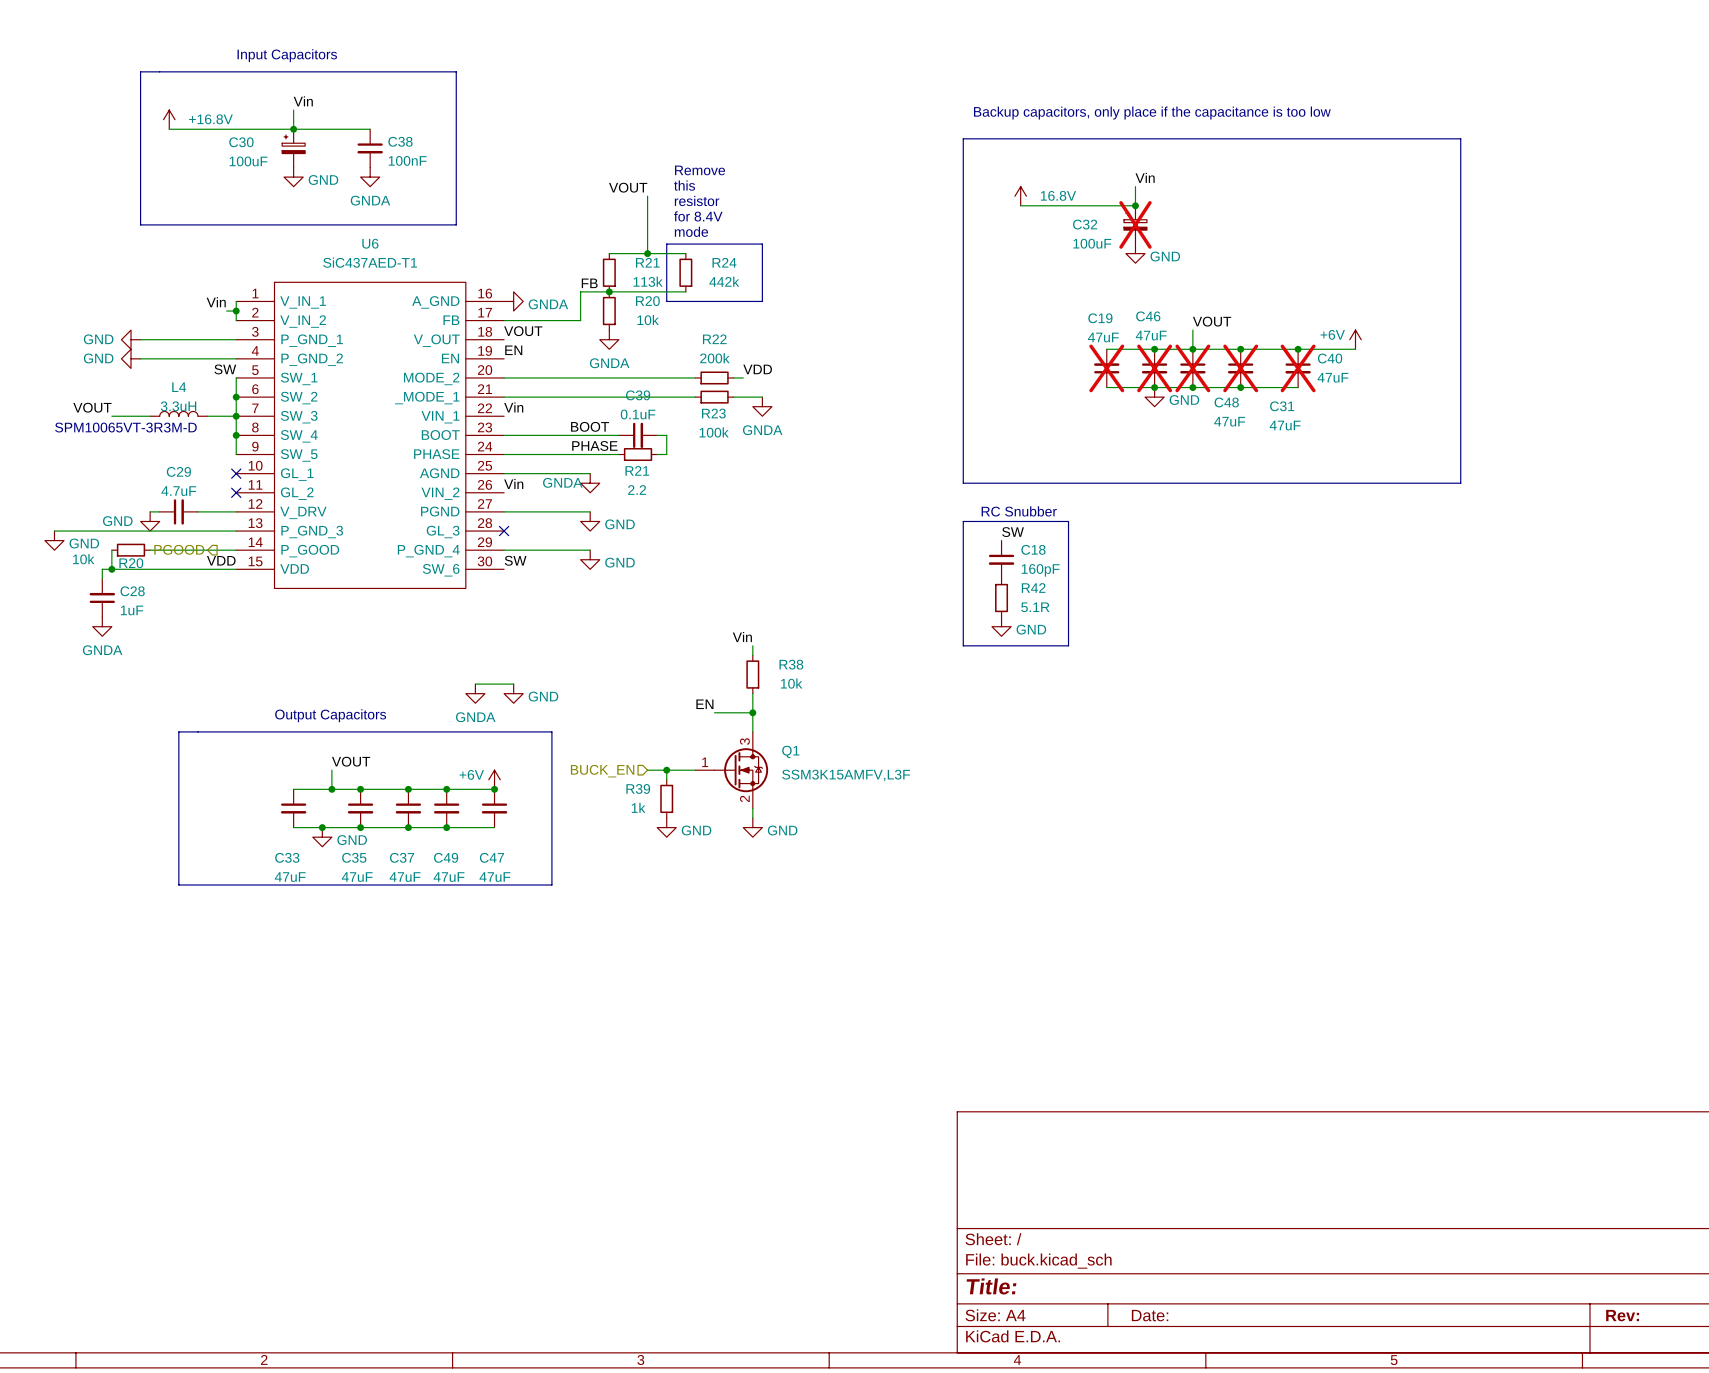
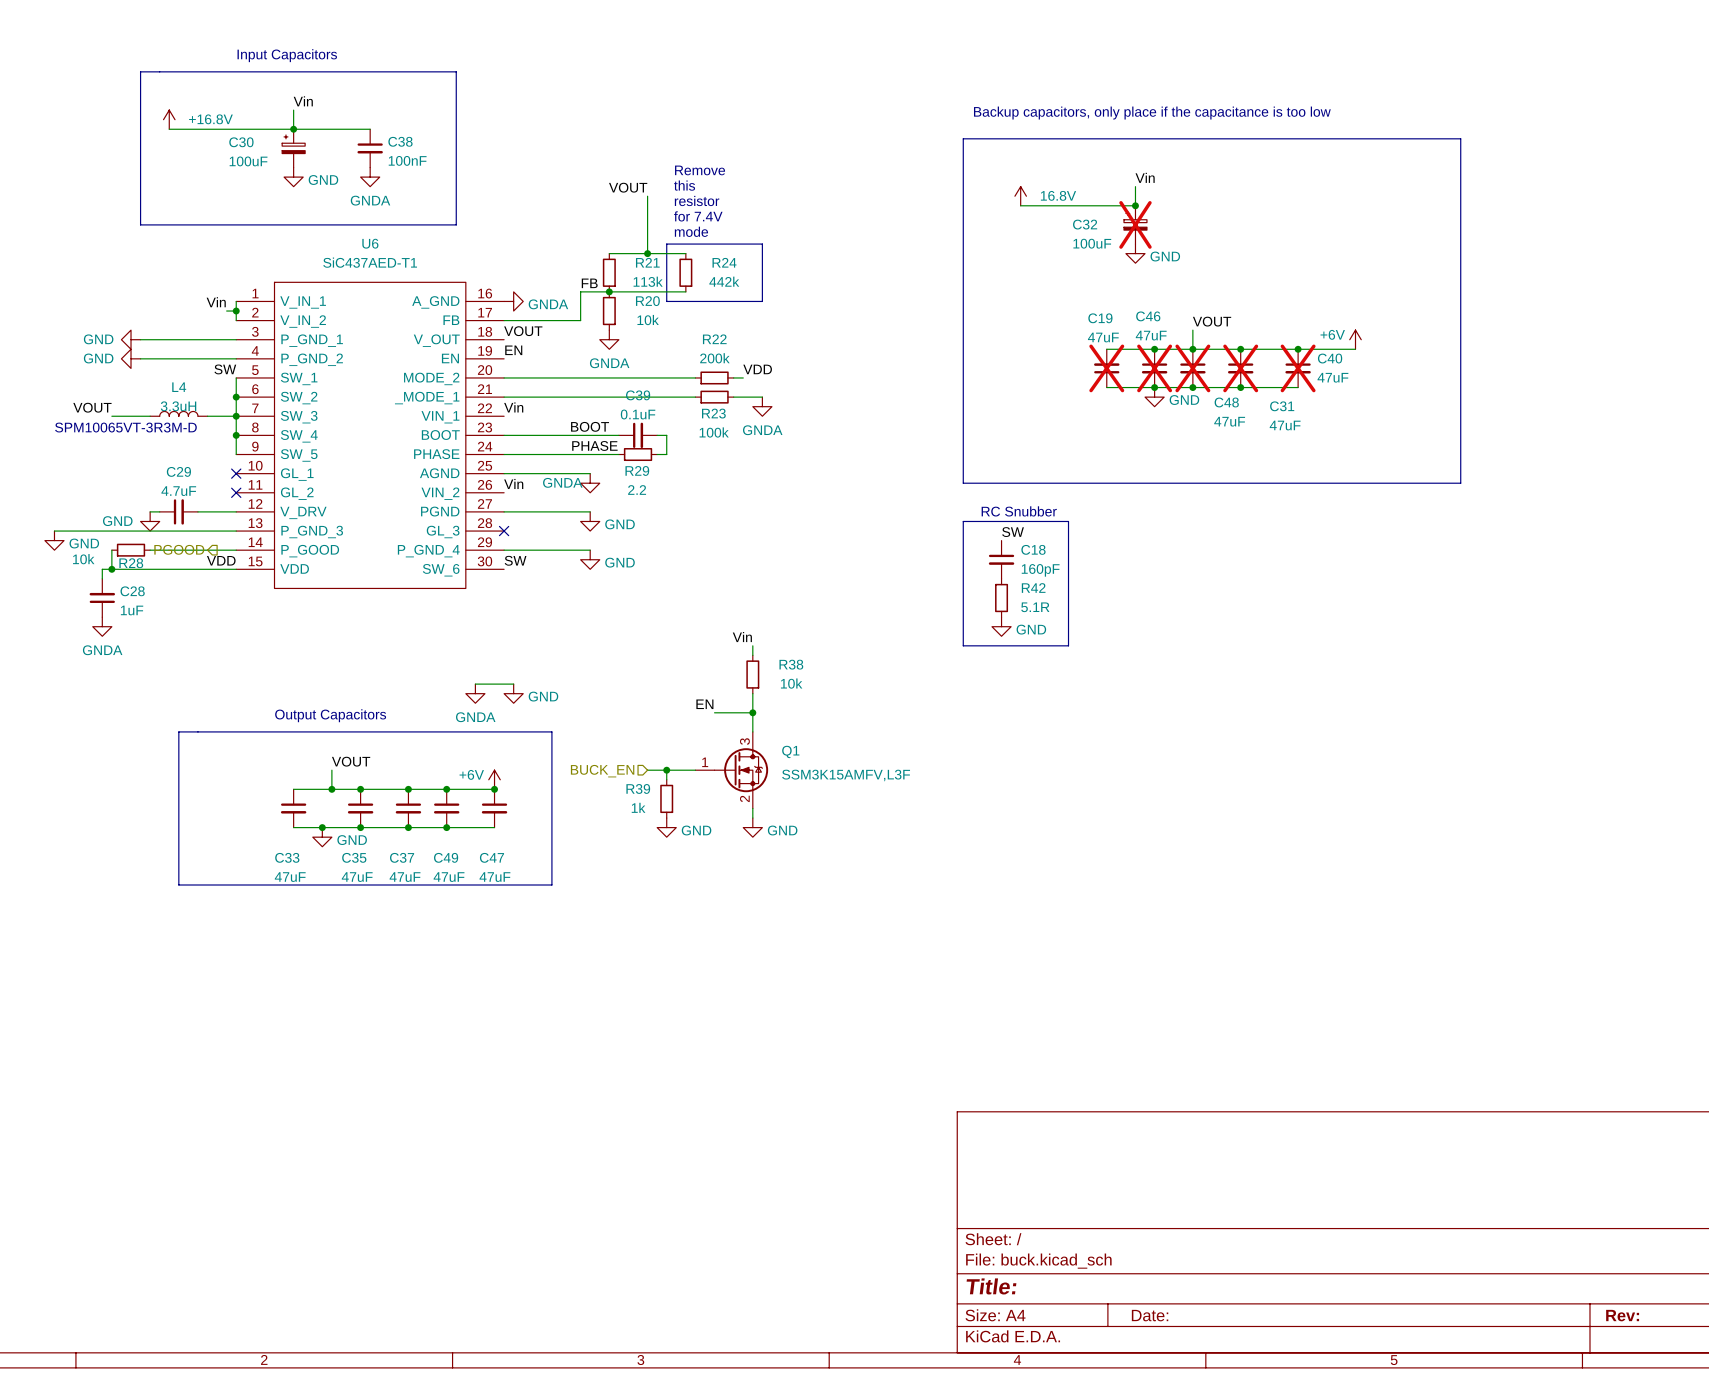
text: for 8.4V (698, 216) -> for 7.4V (698, 216)
R21 name: R21 (637, 470) -> R29 (637, 470)
R20 name: R20 (131, 563) -> R28 (131, 563)

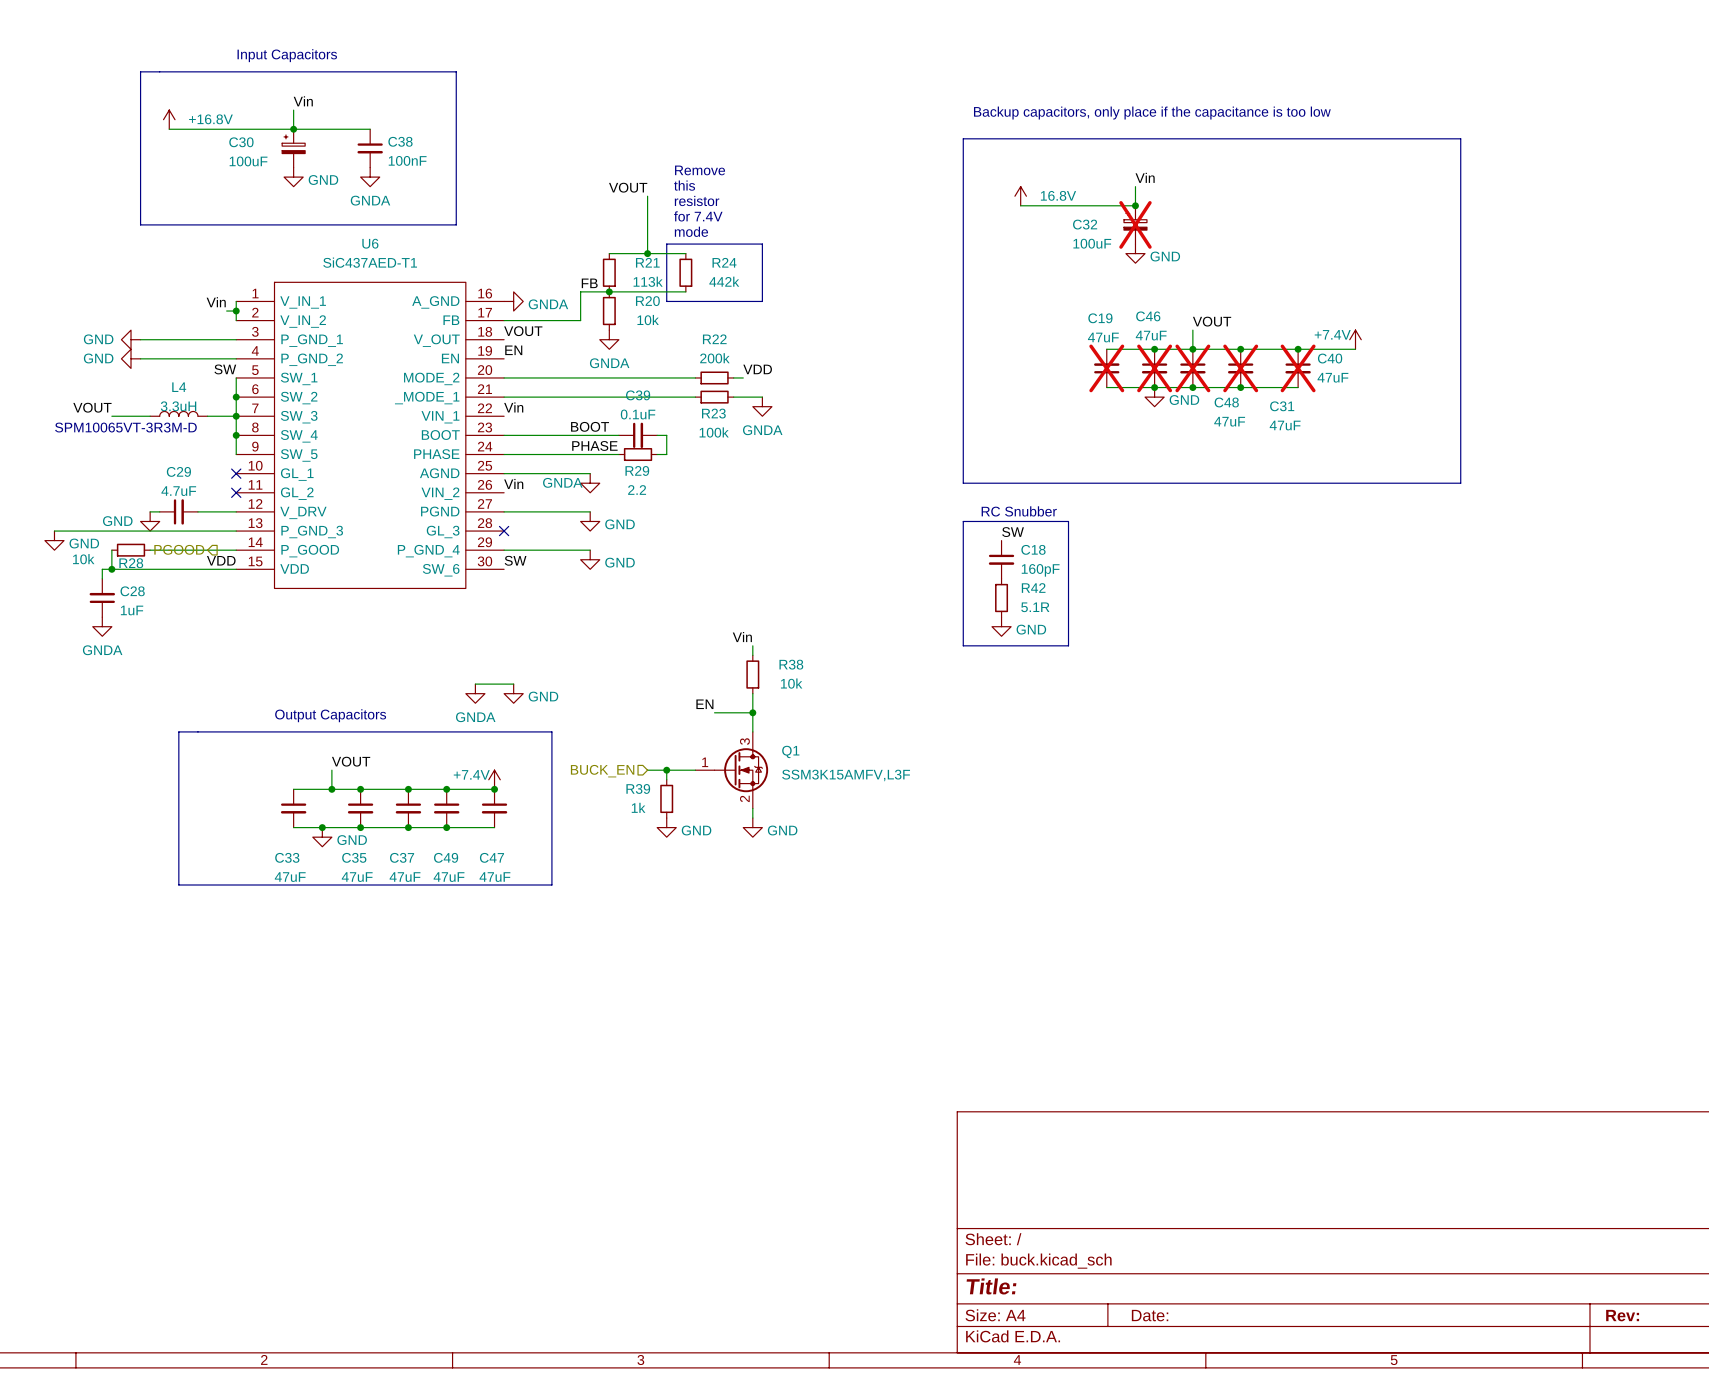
power symbol: +6V (1355, 339) -> +7.4V (1355, 339)
power symbol: +6V (494, 779) -> +7.4V (494, 779)

